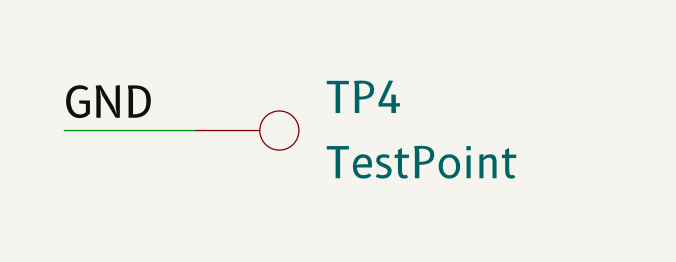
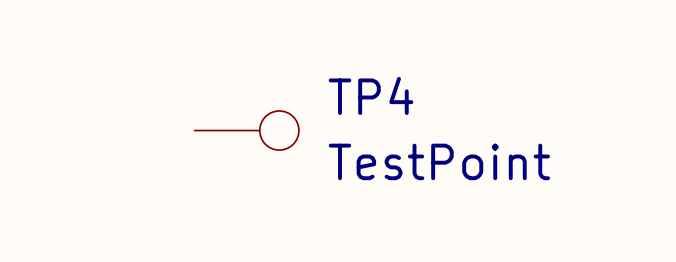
label: GND (108, 101) -> none
wire: (64, 130) (194, 130) -> none

